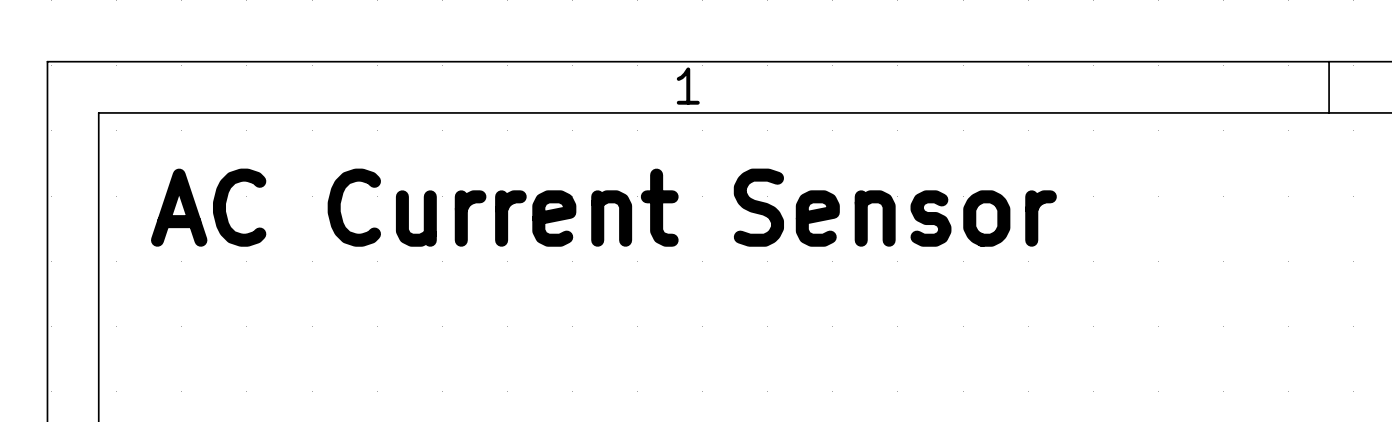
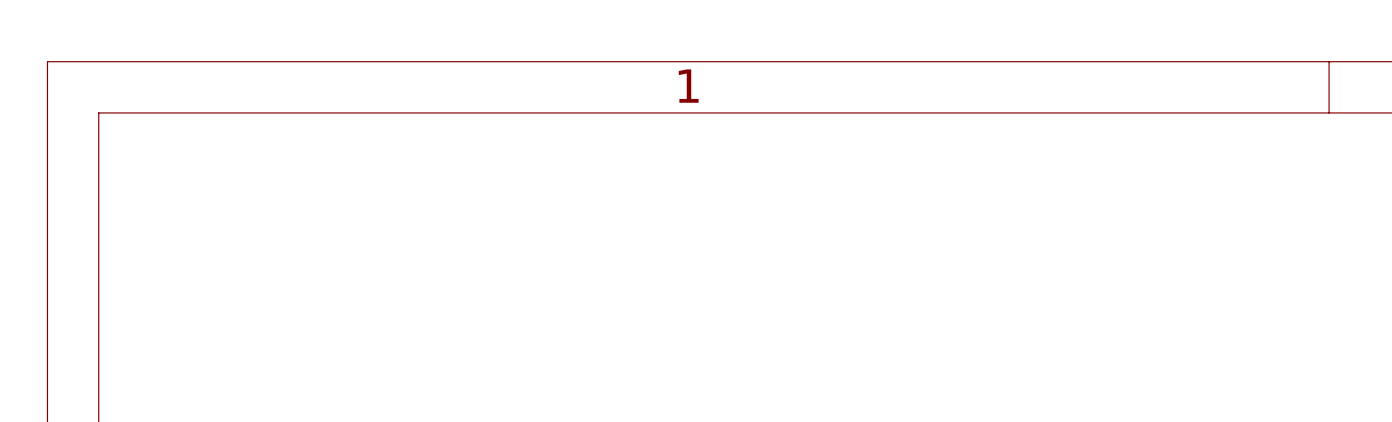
text: AC Current Sensor (603, 207) -> none

